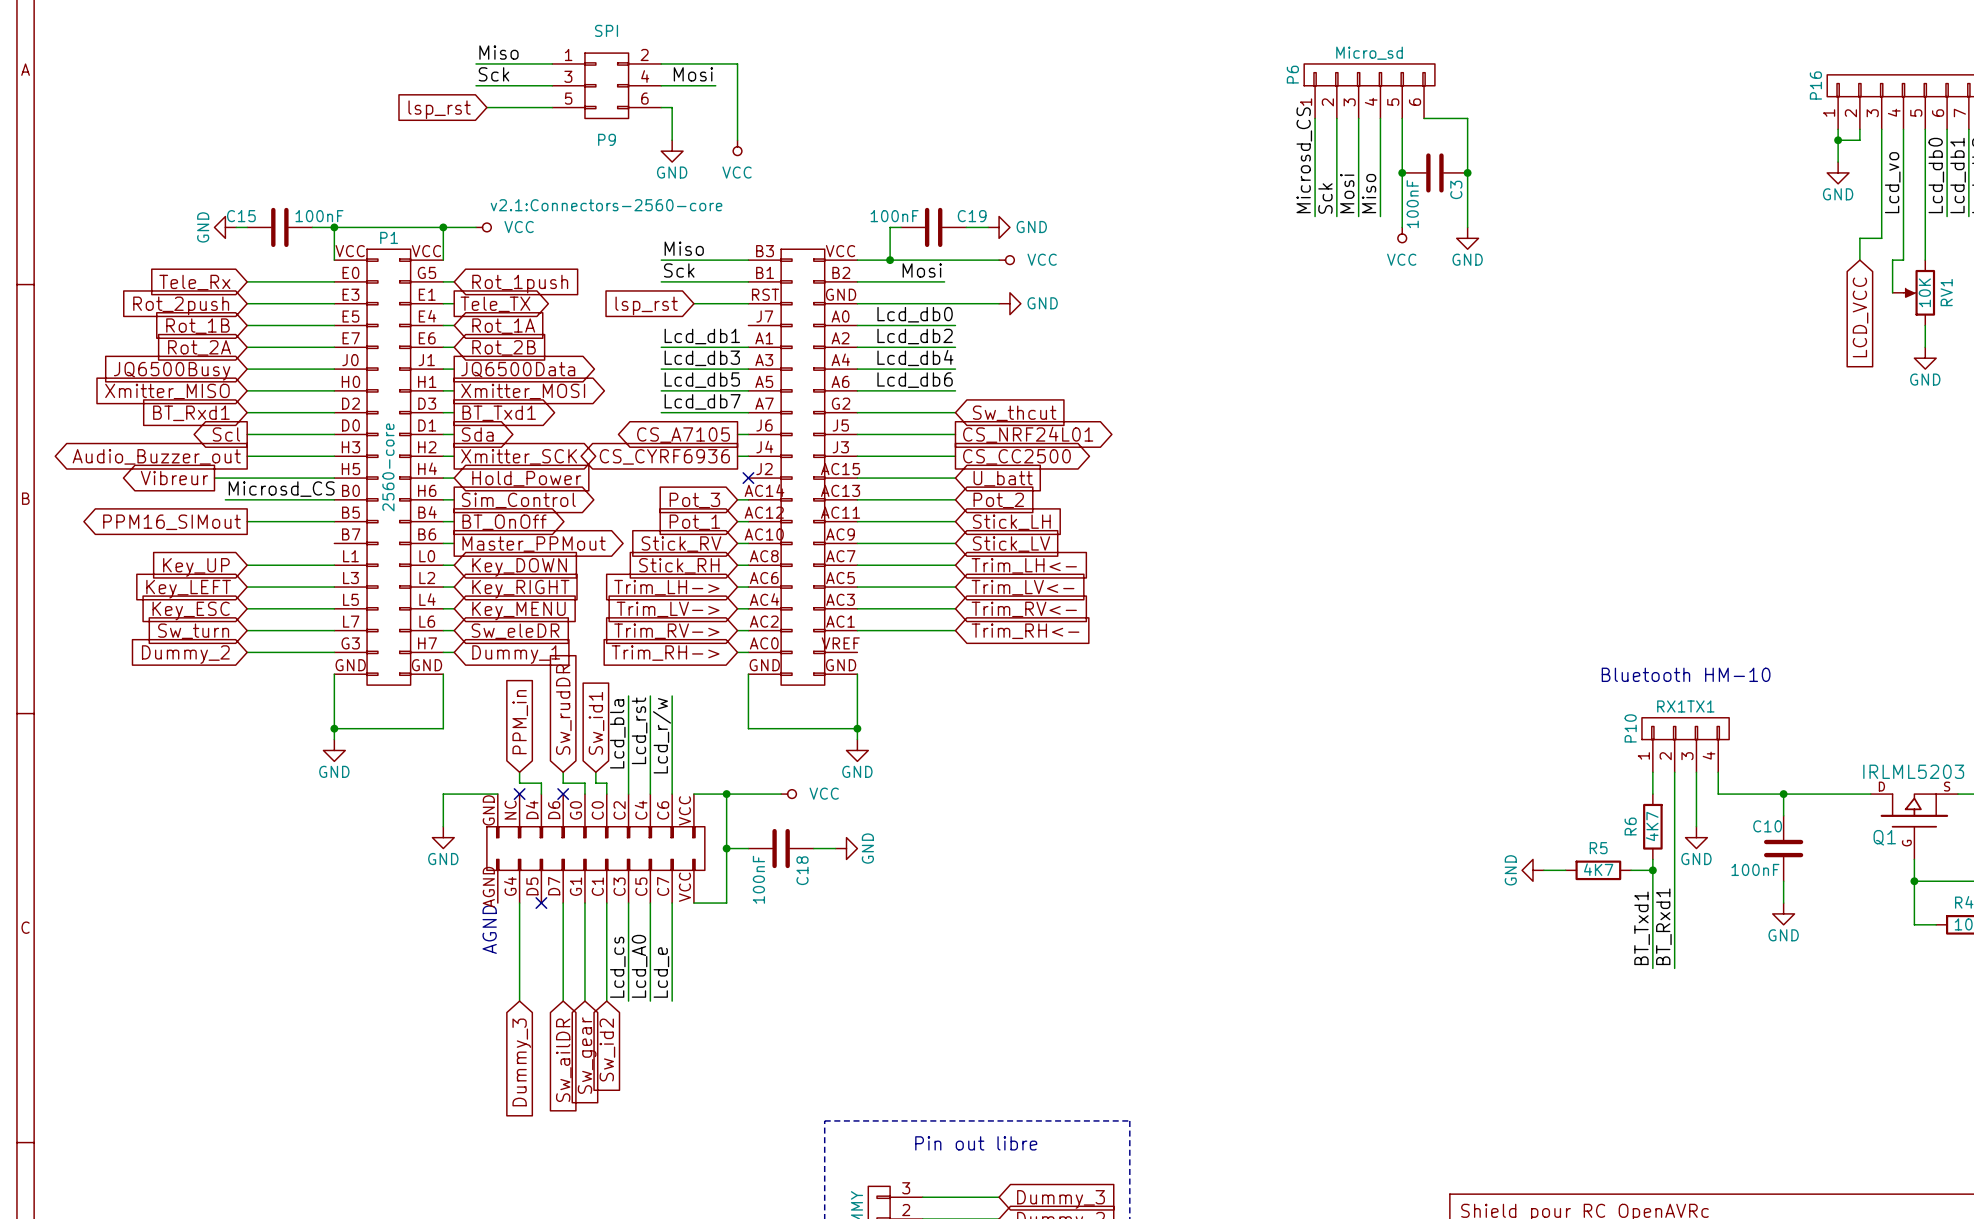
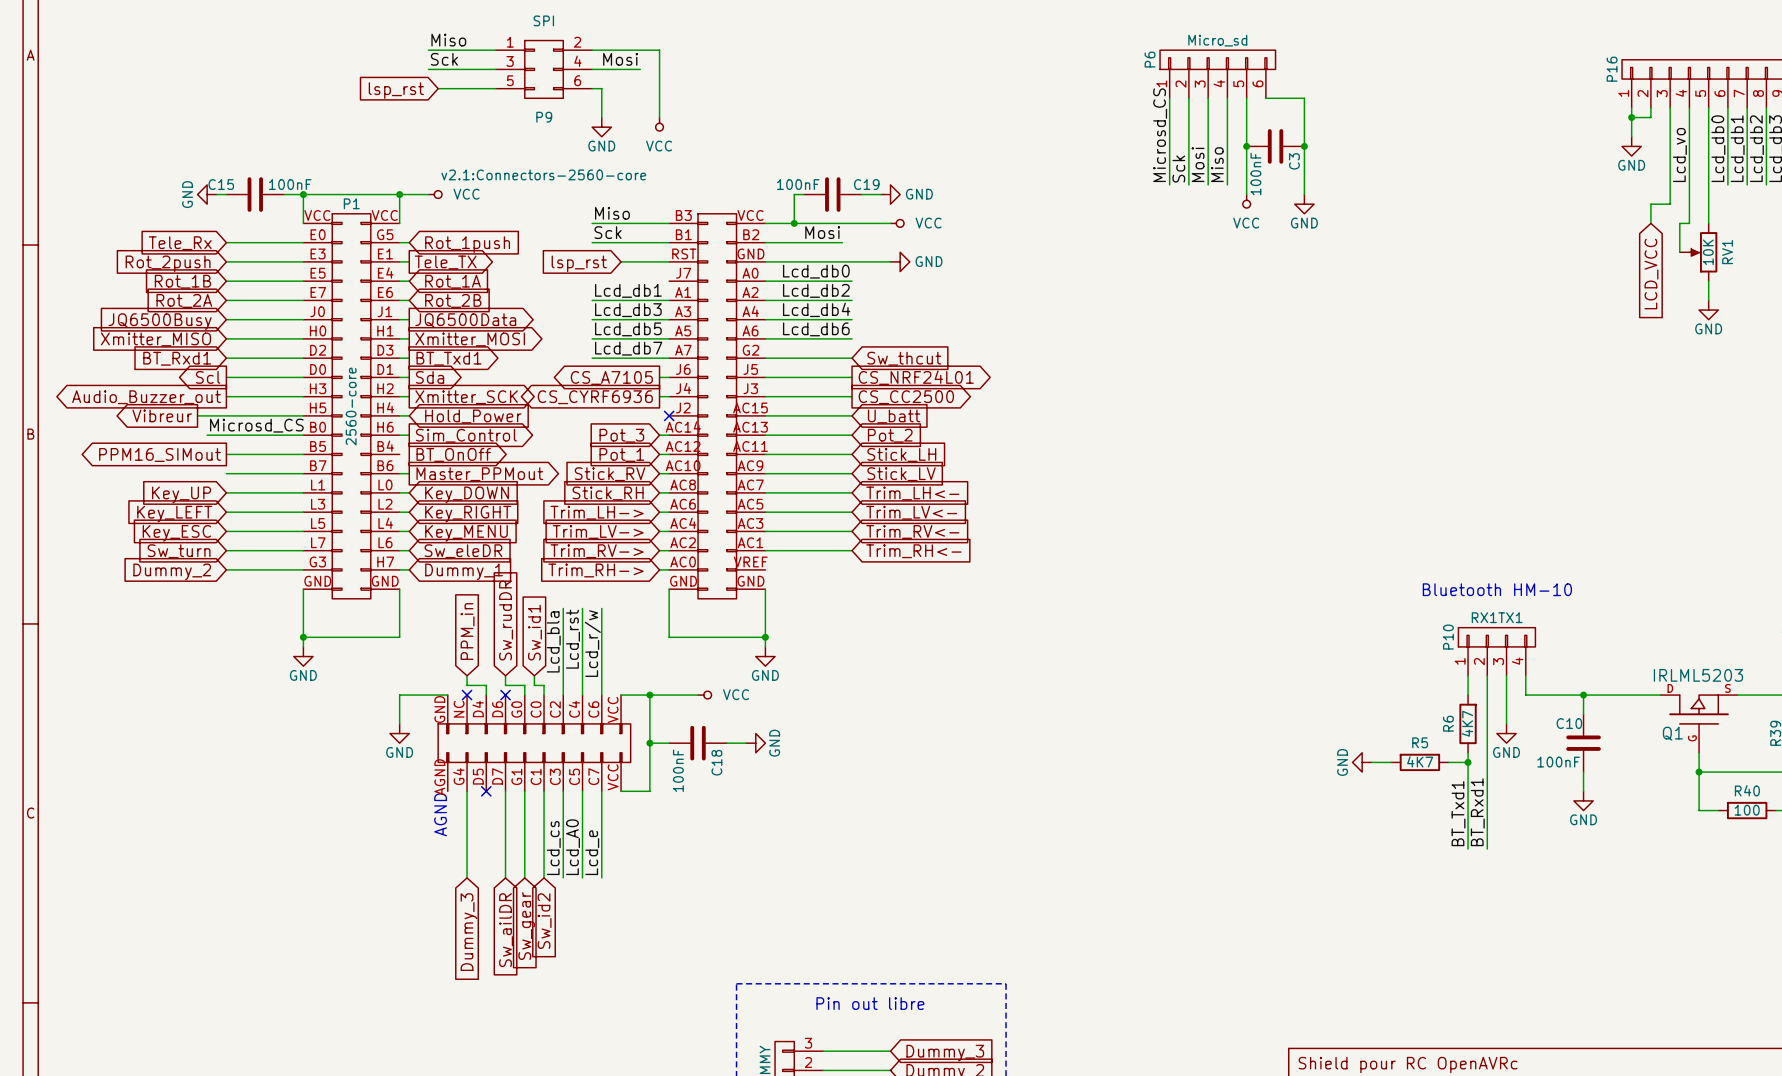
wire: (443, 521) (454, 521) -> none
wire: none -> (226, 473) (303, 473)

